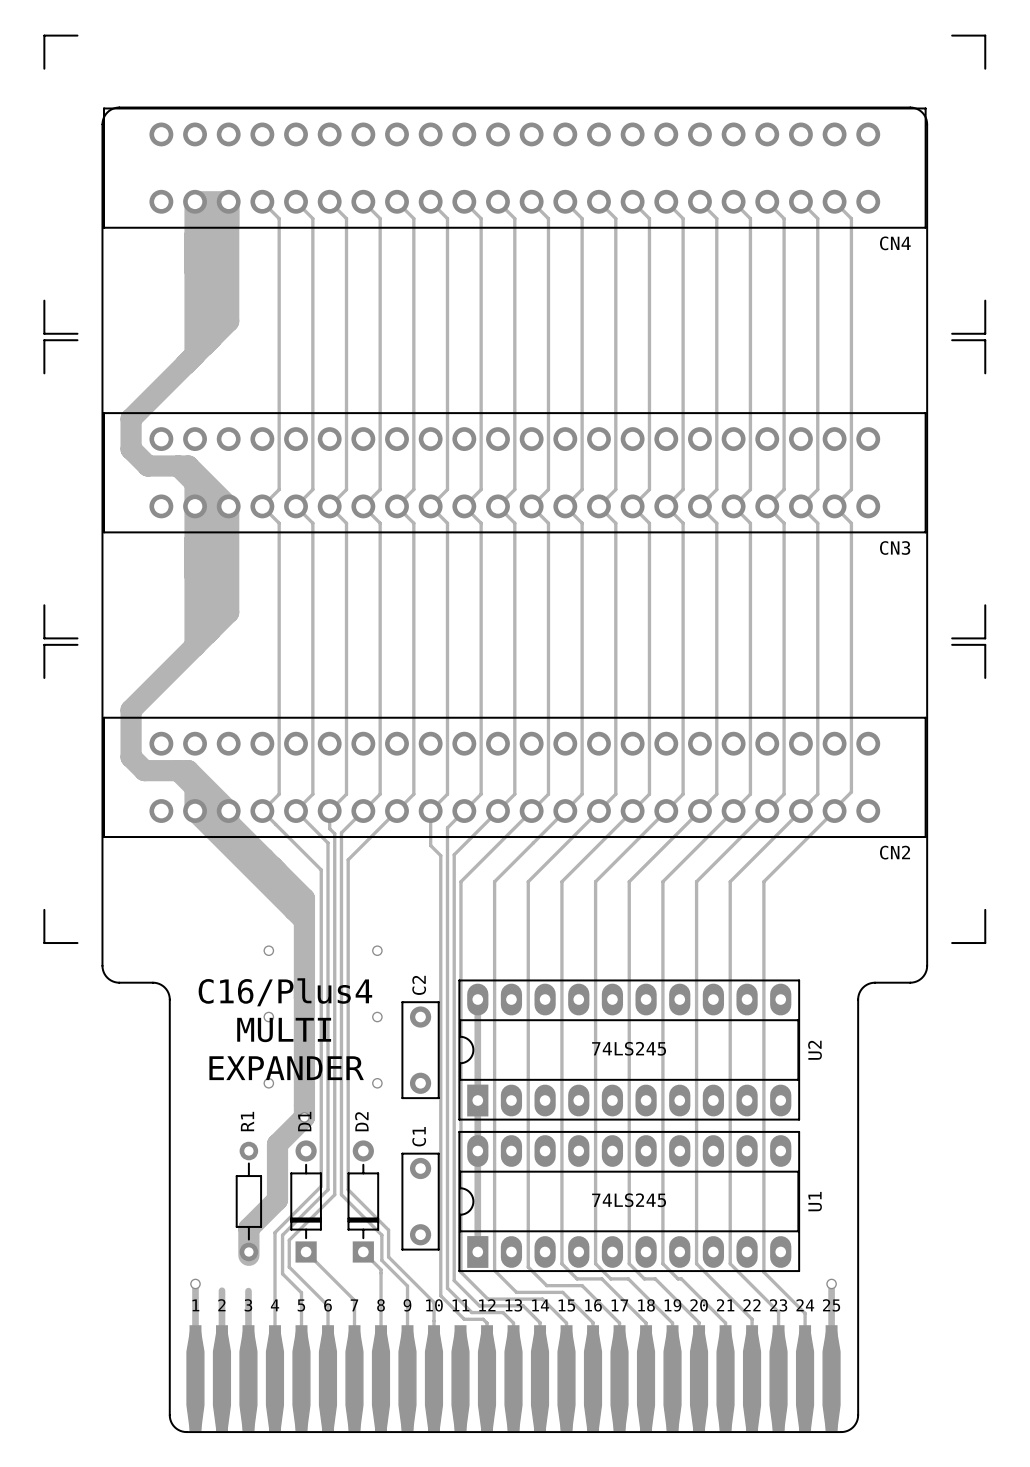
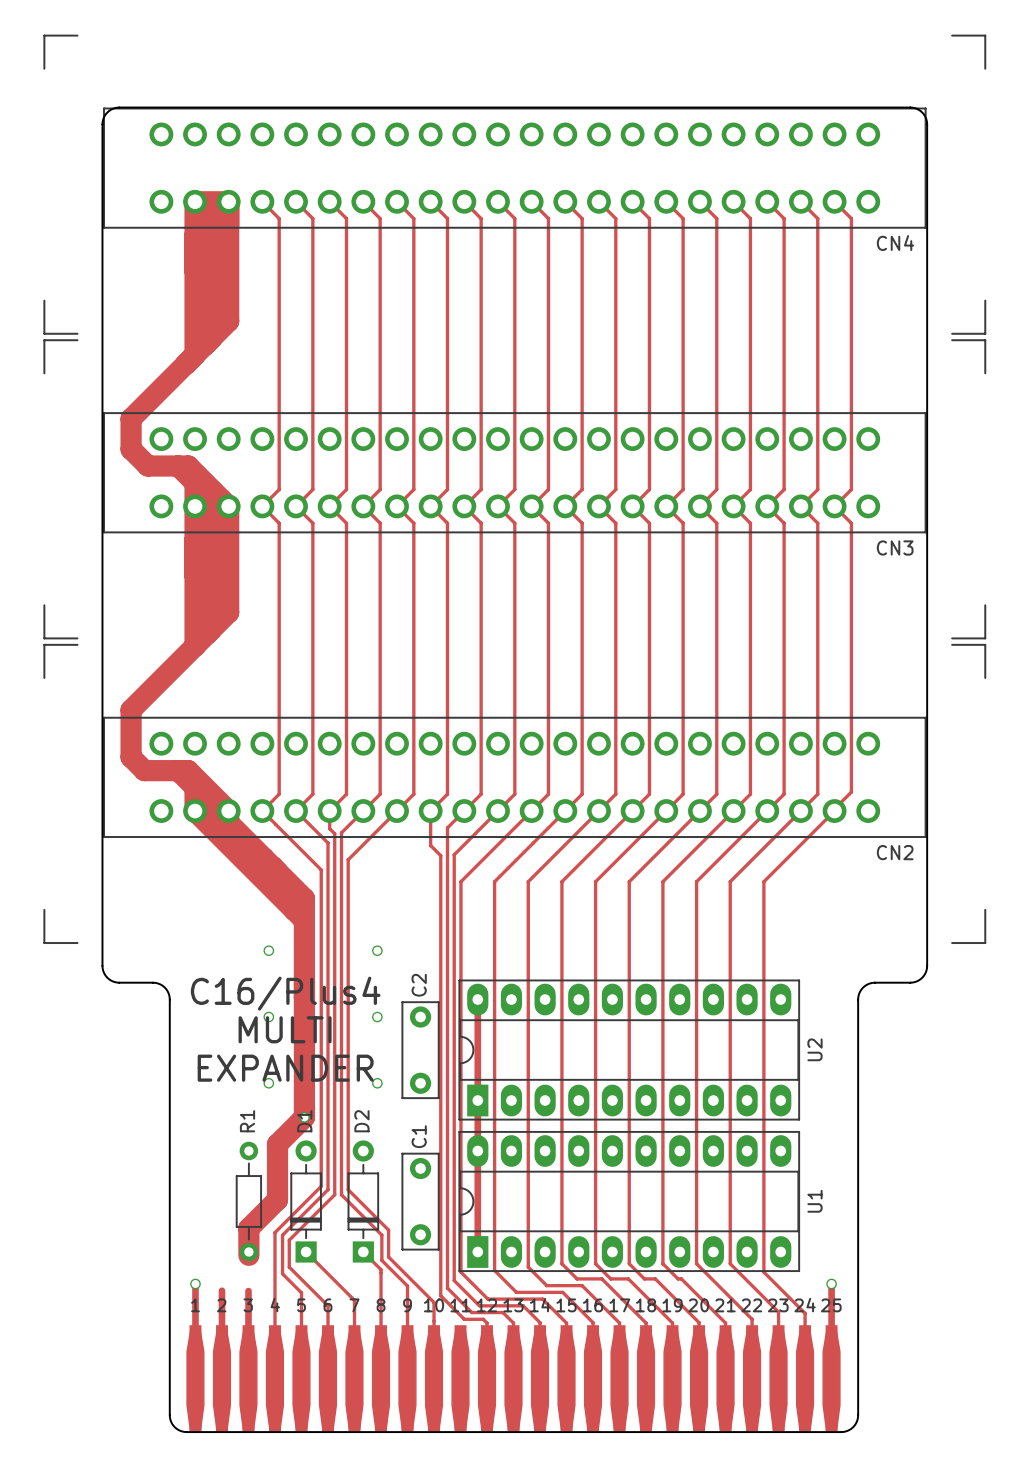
U2 value: 74LS245 (629, 1048) -> none
U1 value: 74LS245 (629, 1200) -> none

